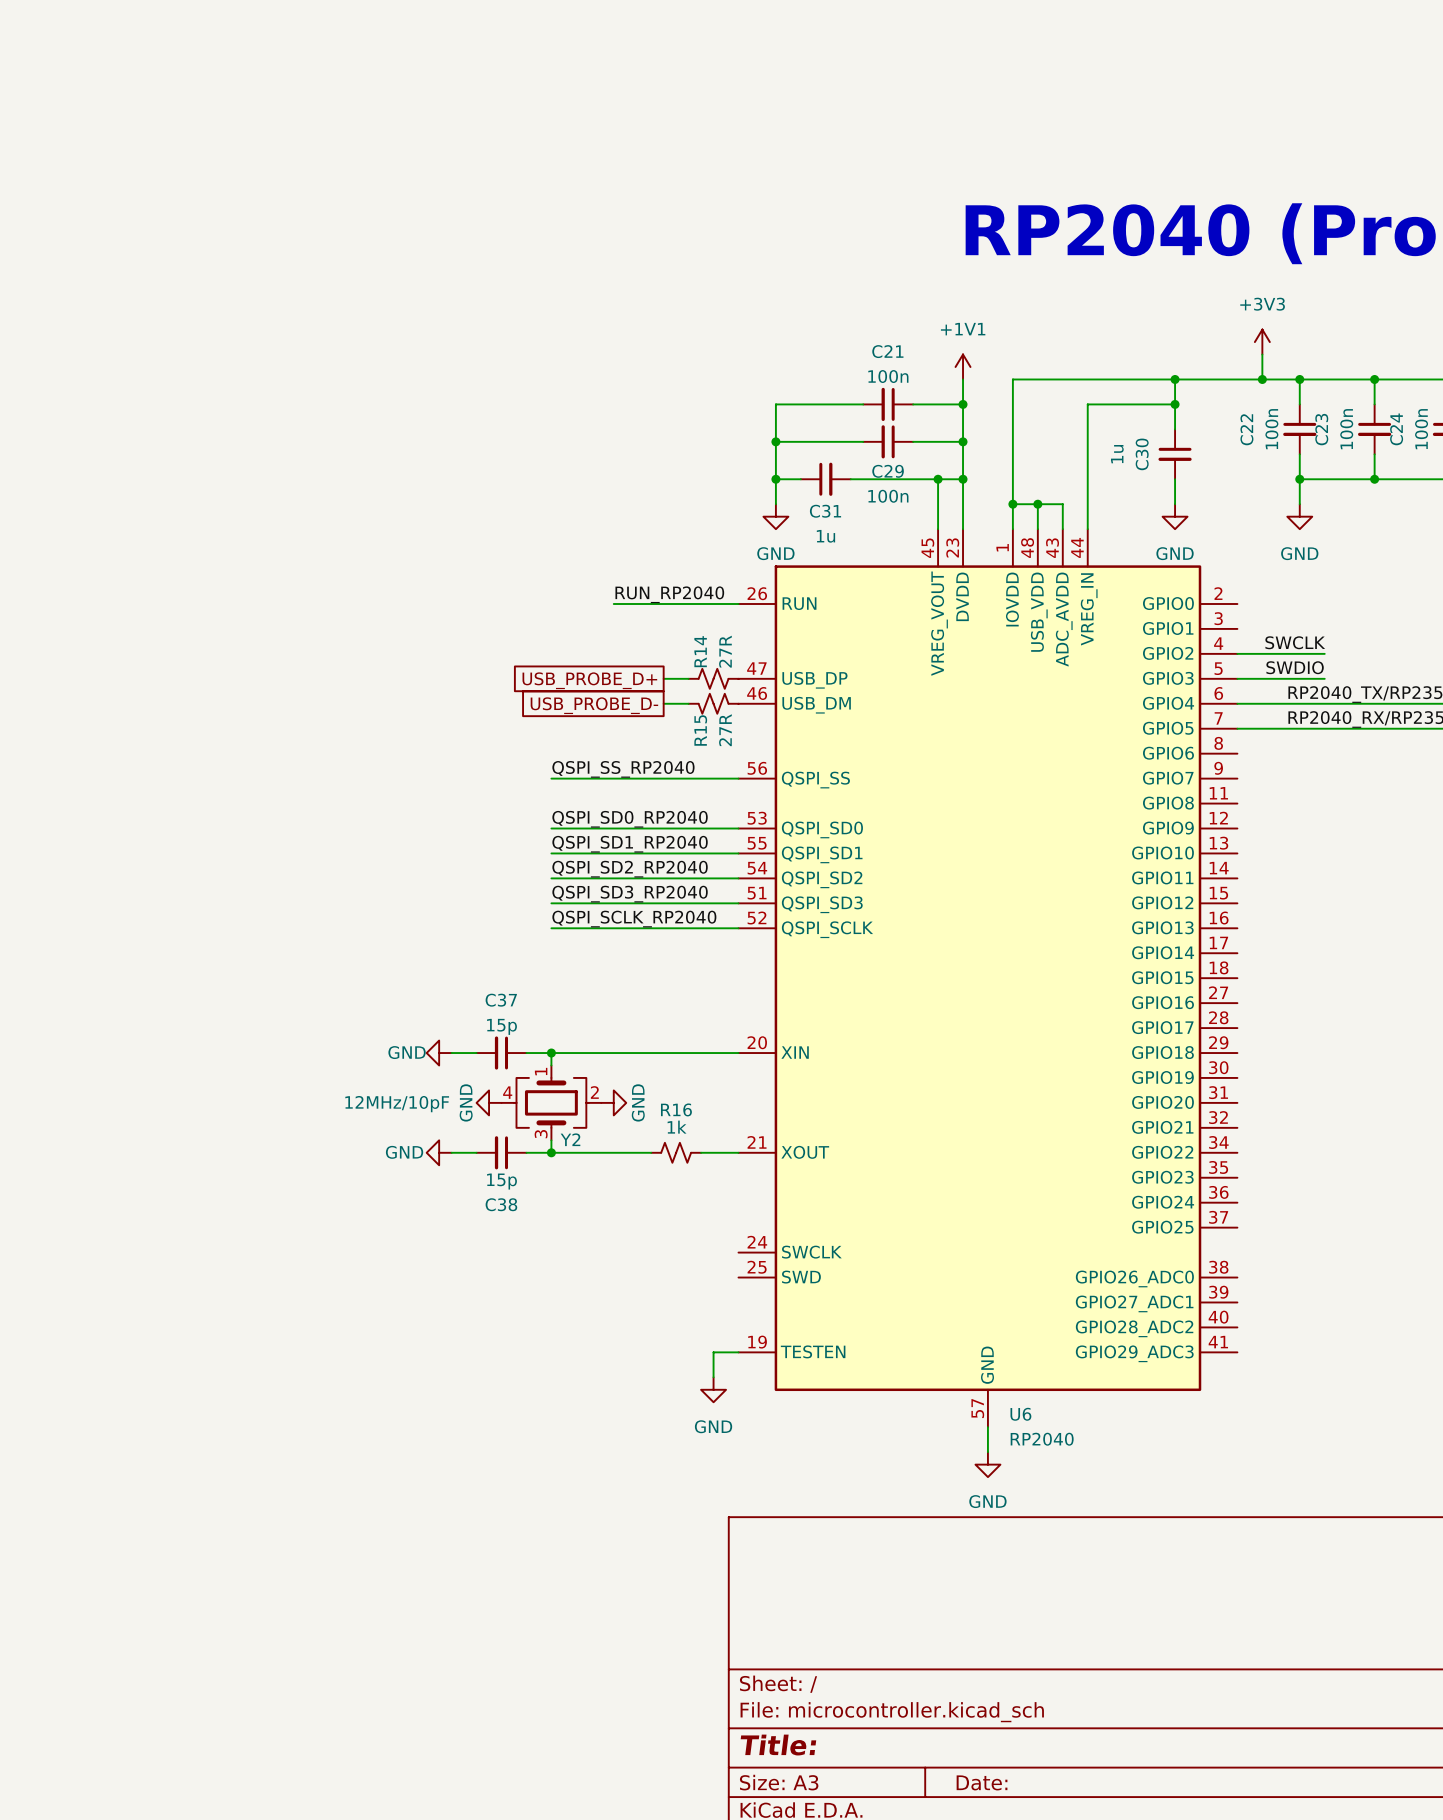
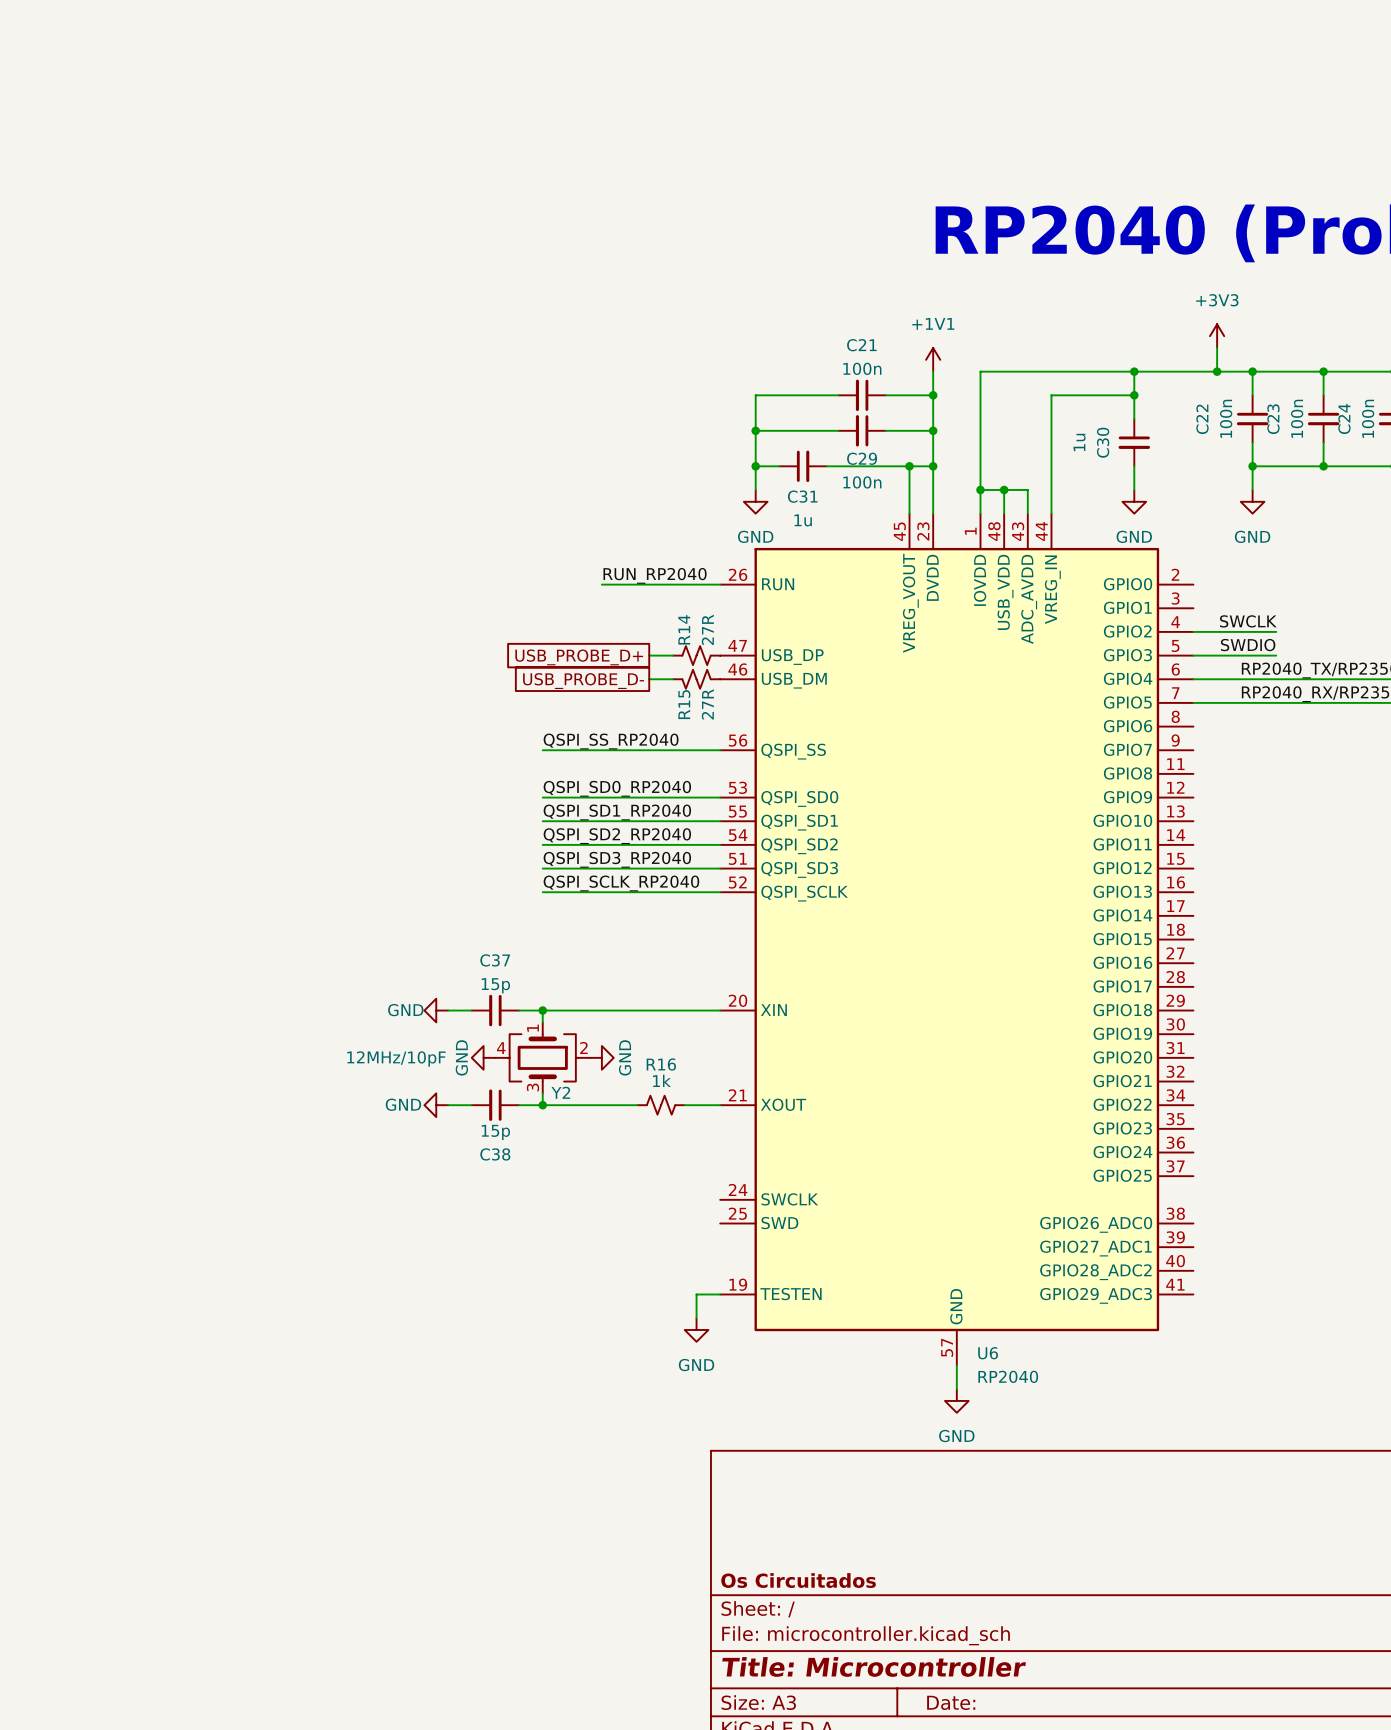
title block: none -> Os Circuitados (798, 1580)
title block: Title: (778, 1745) -> Title: Microcontroller (874, 1666)

